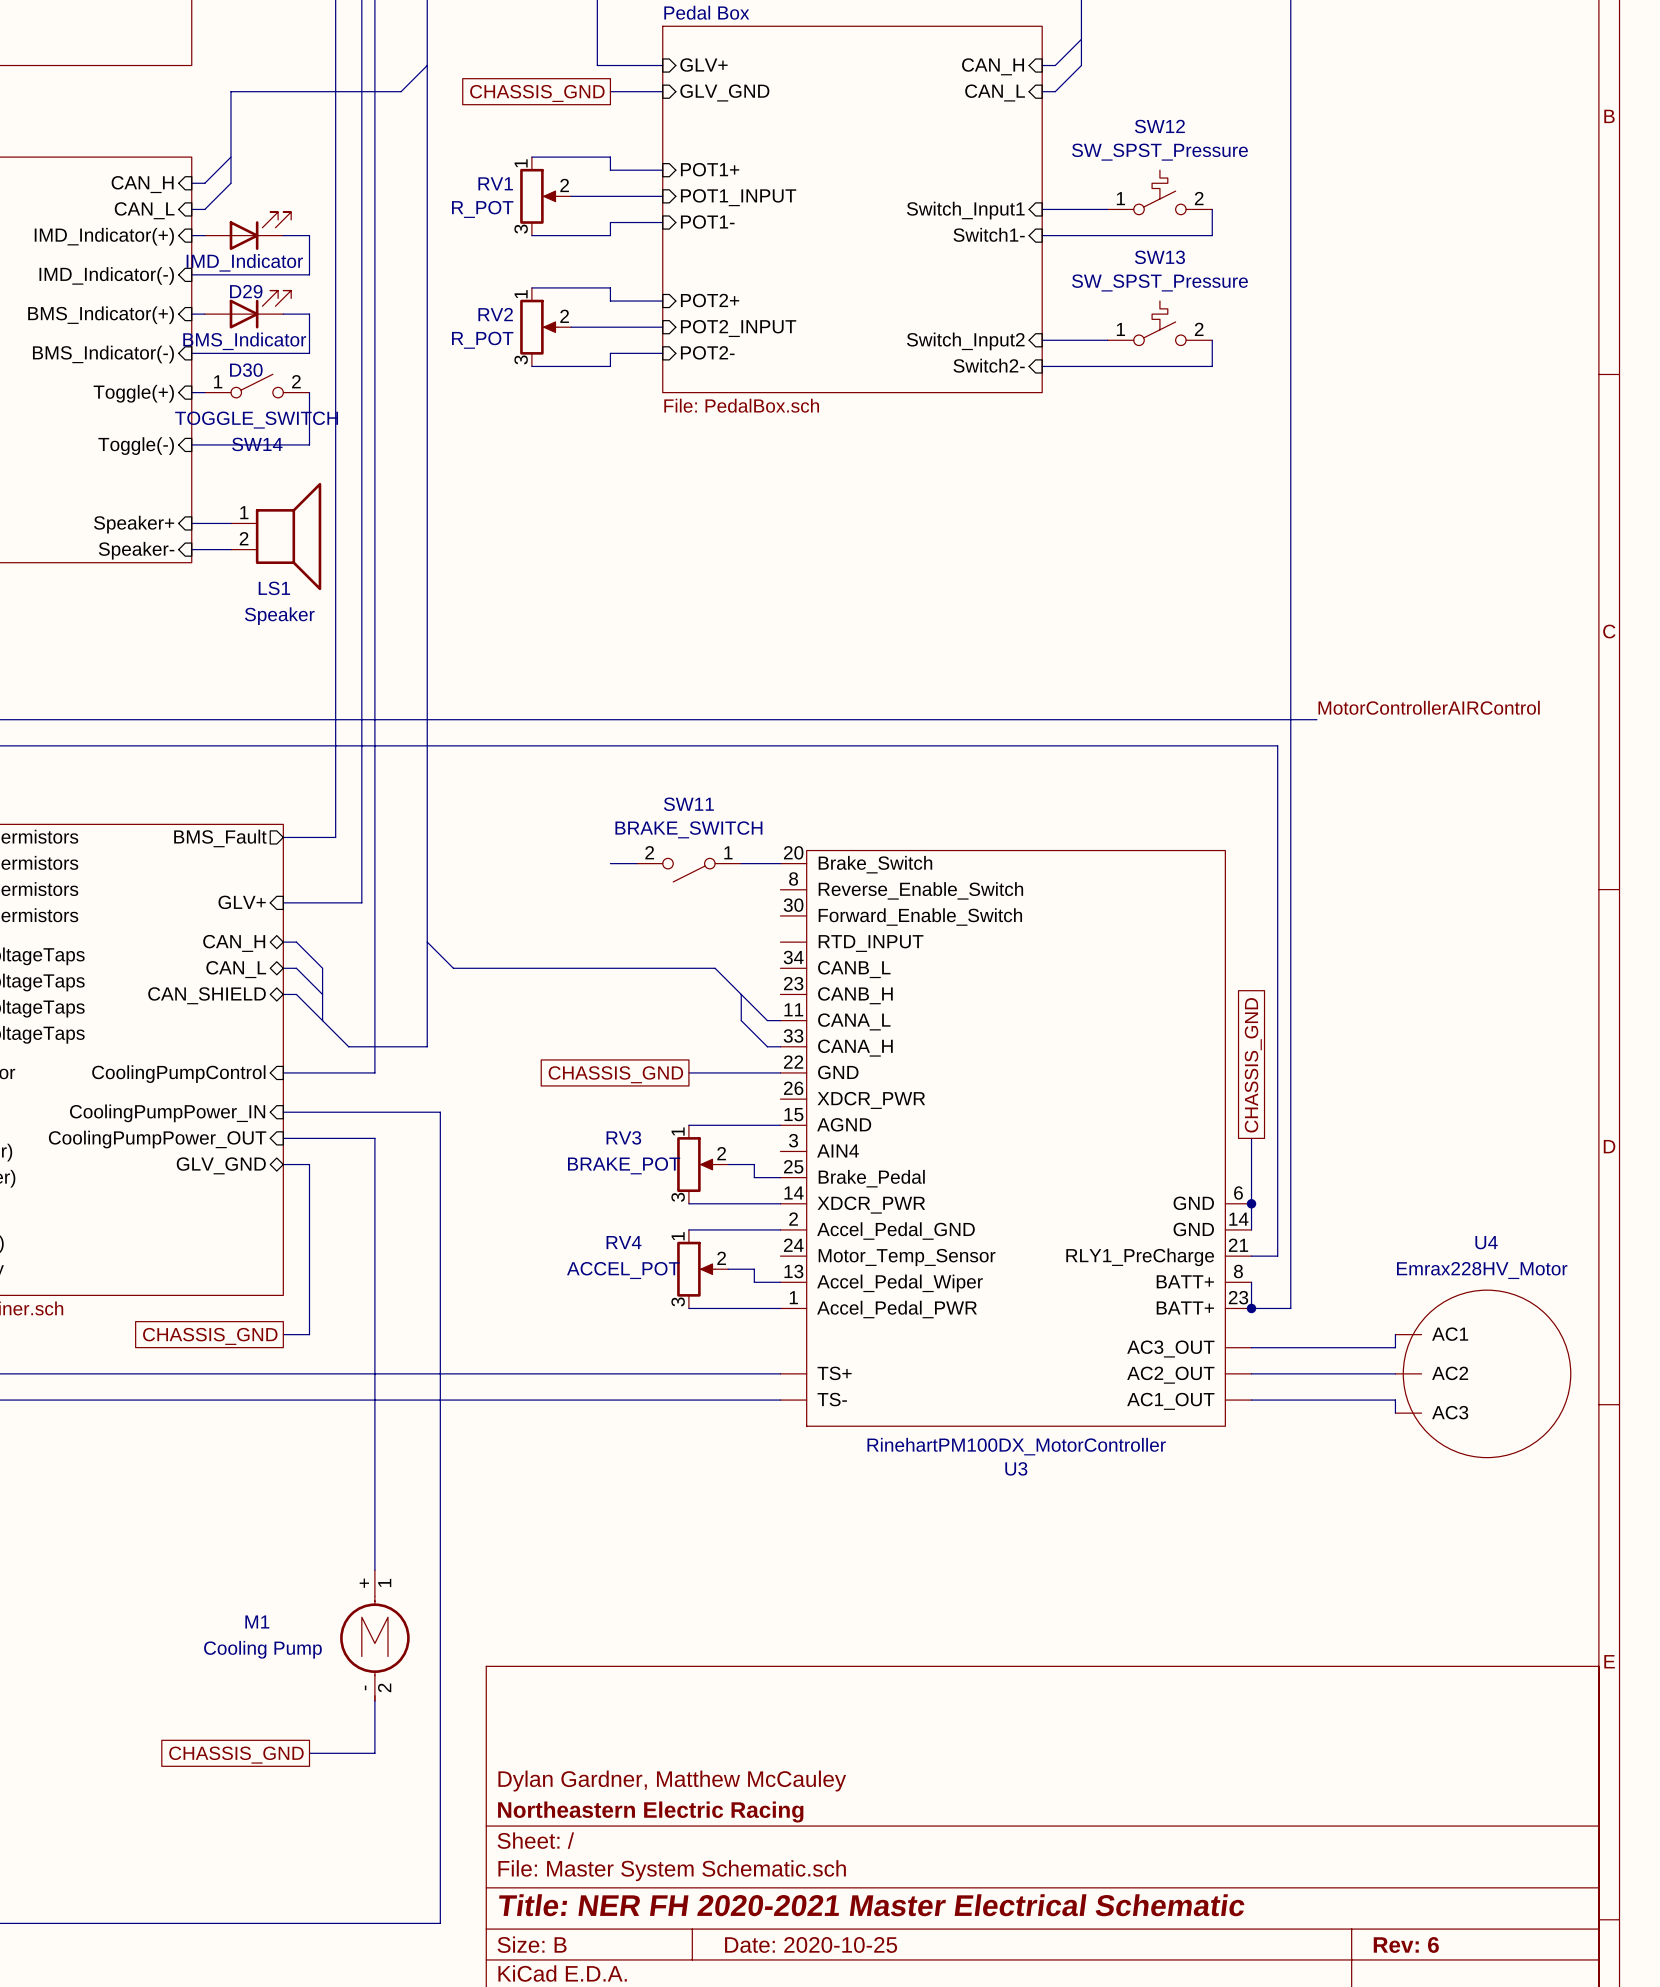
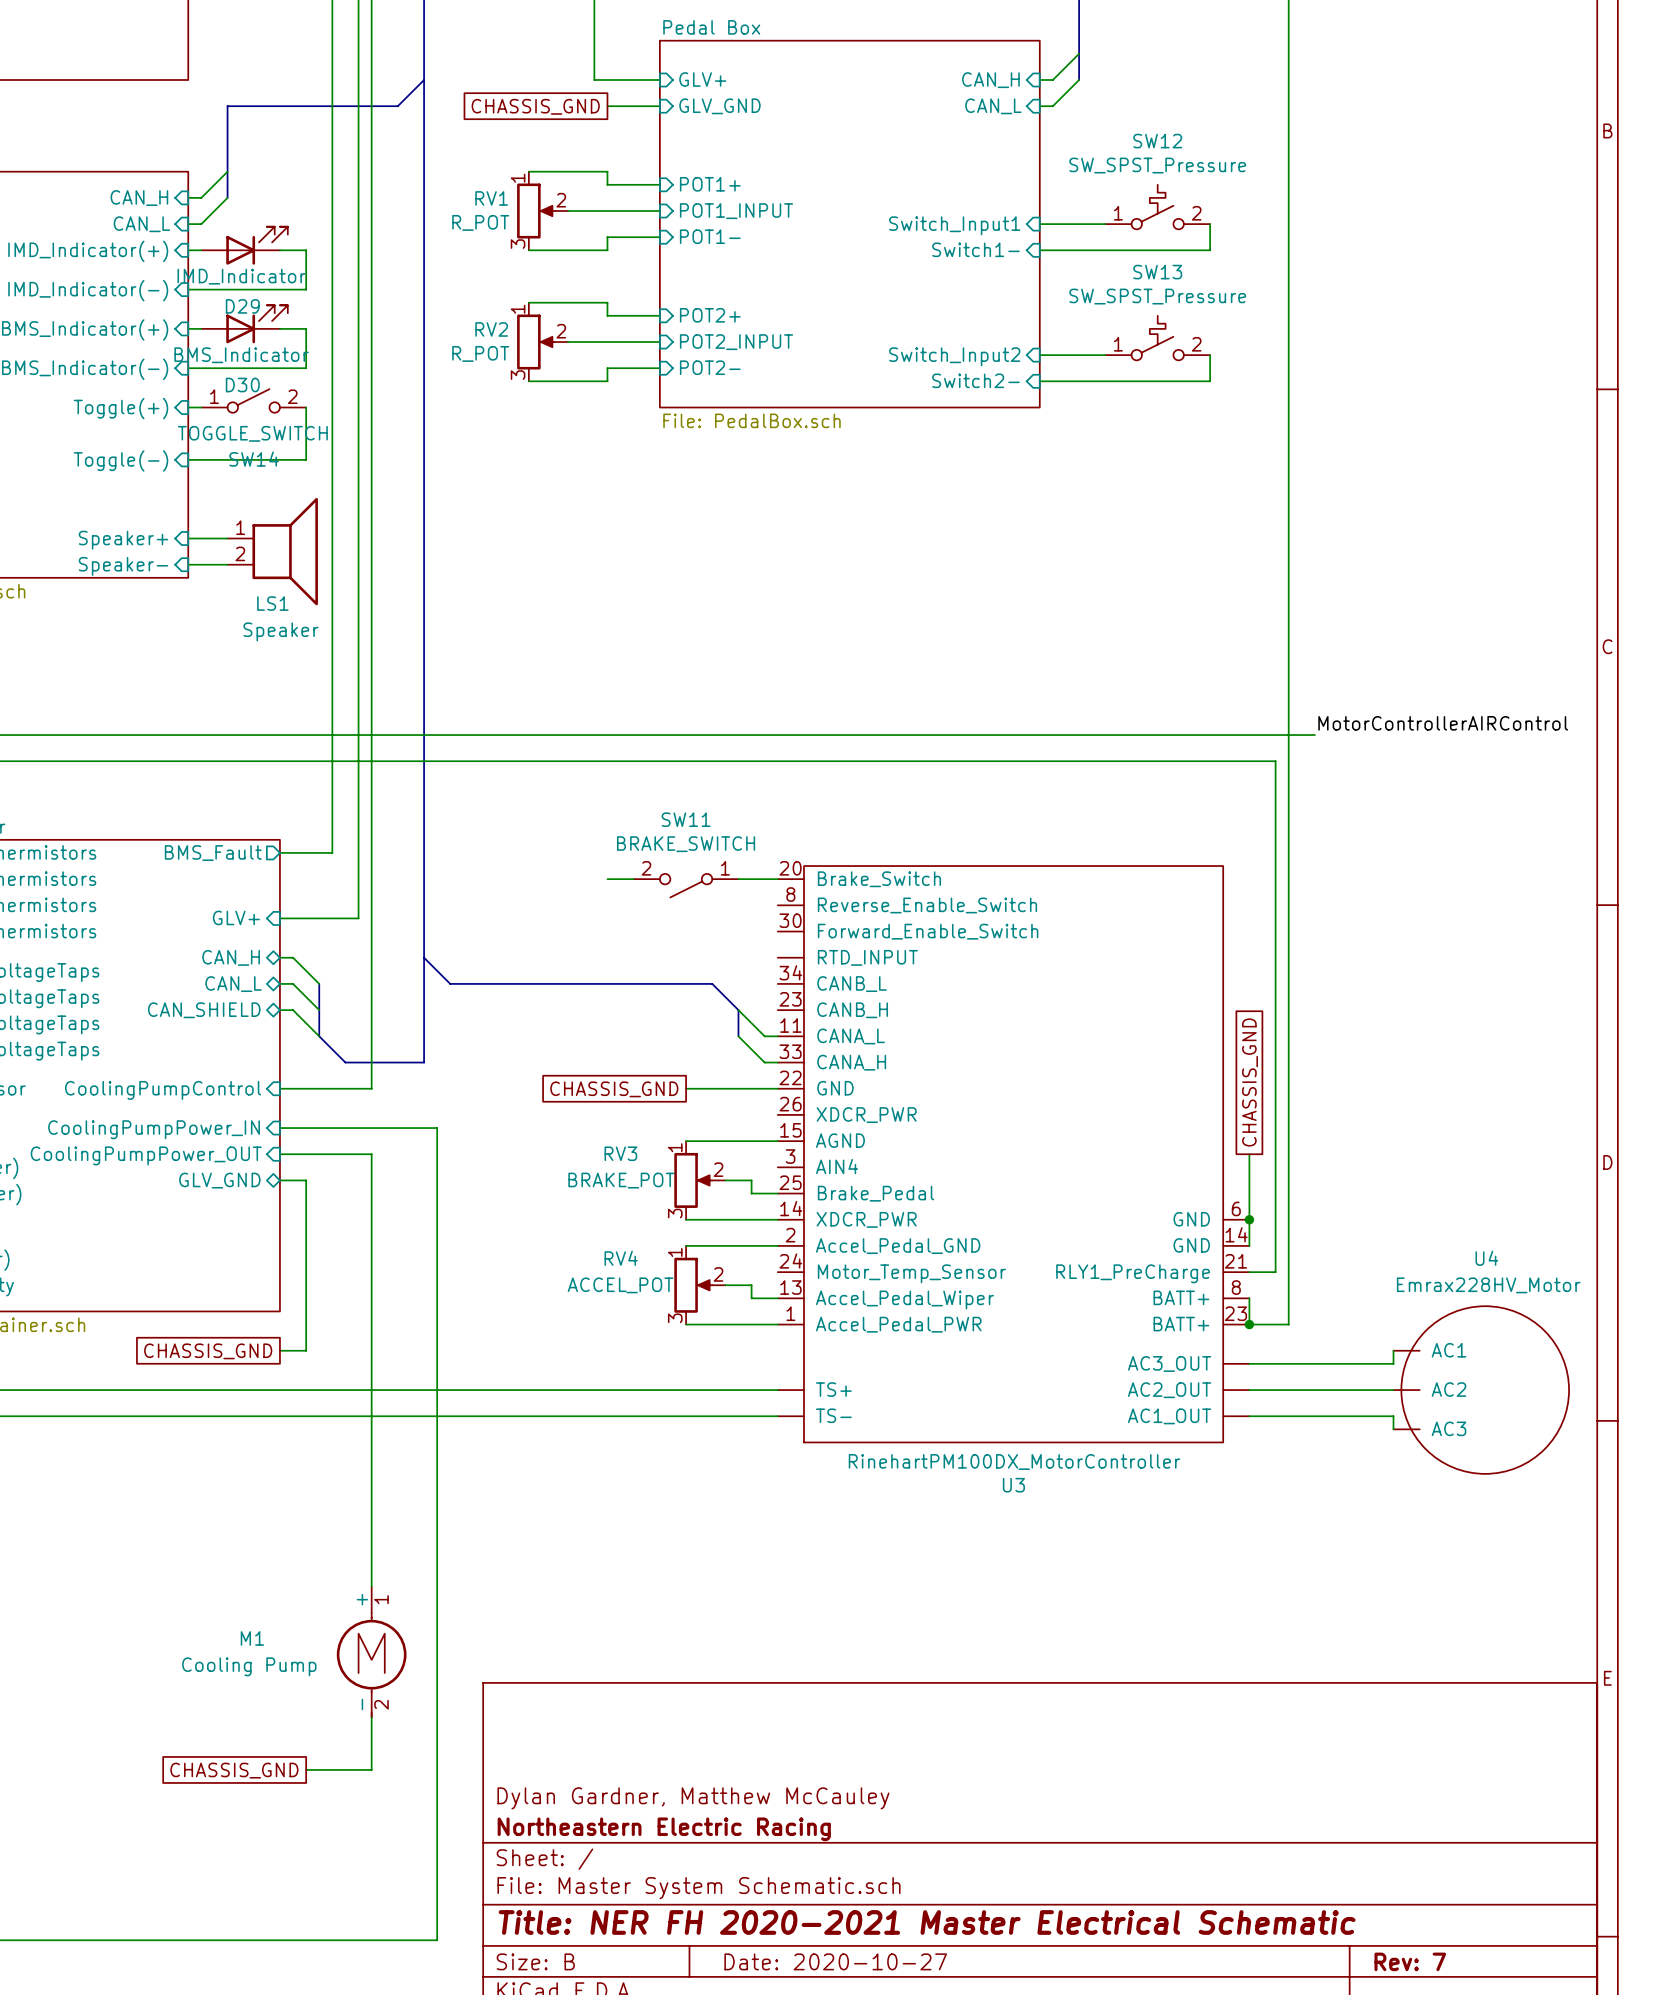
title block: Date: 2020-10-25 (811, 1944) -> Date: 2020-10-27 (835, 1961)
title block: Rev: 6 (1406, 1944) -> Rev: 7 (1410, 1961)

